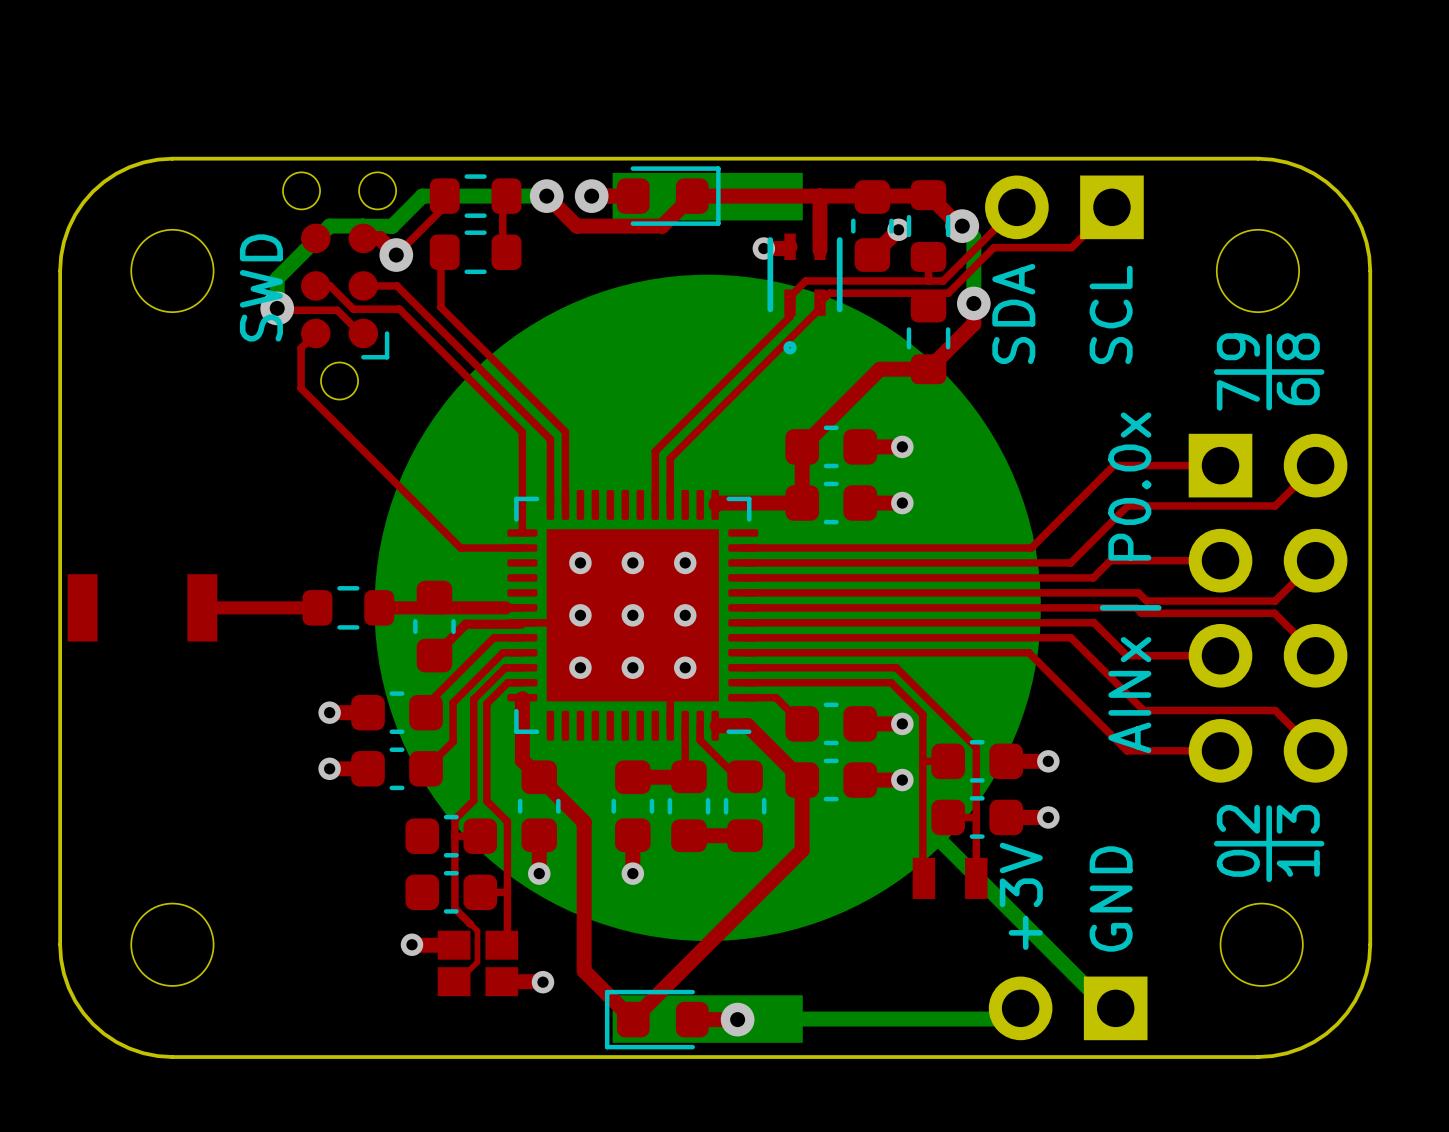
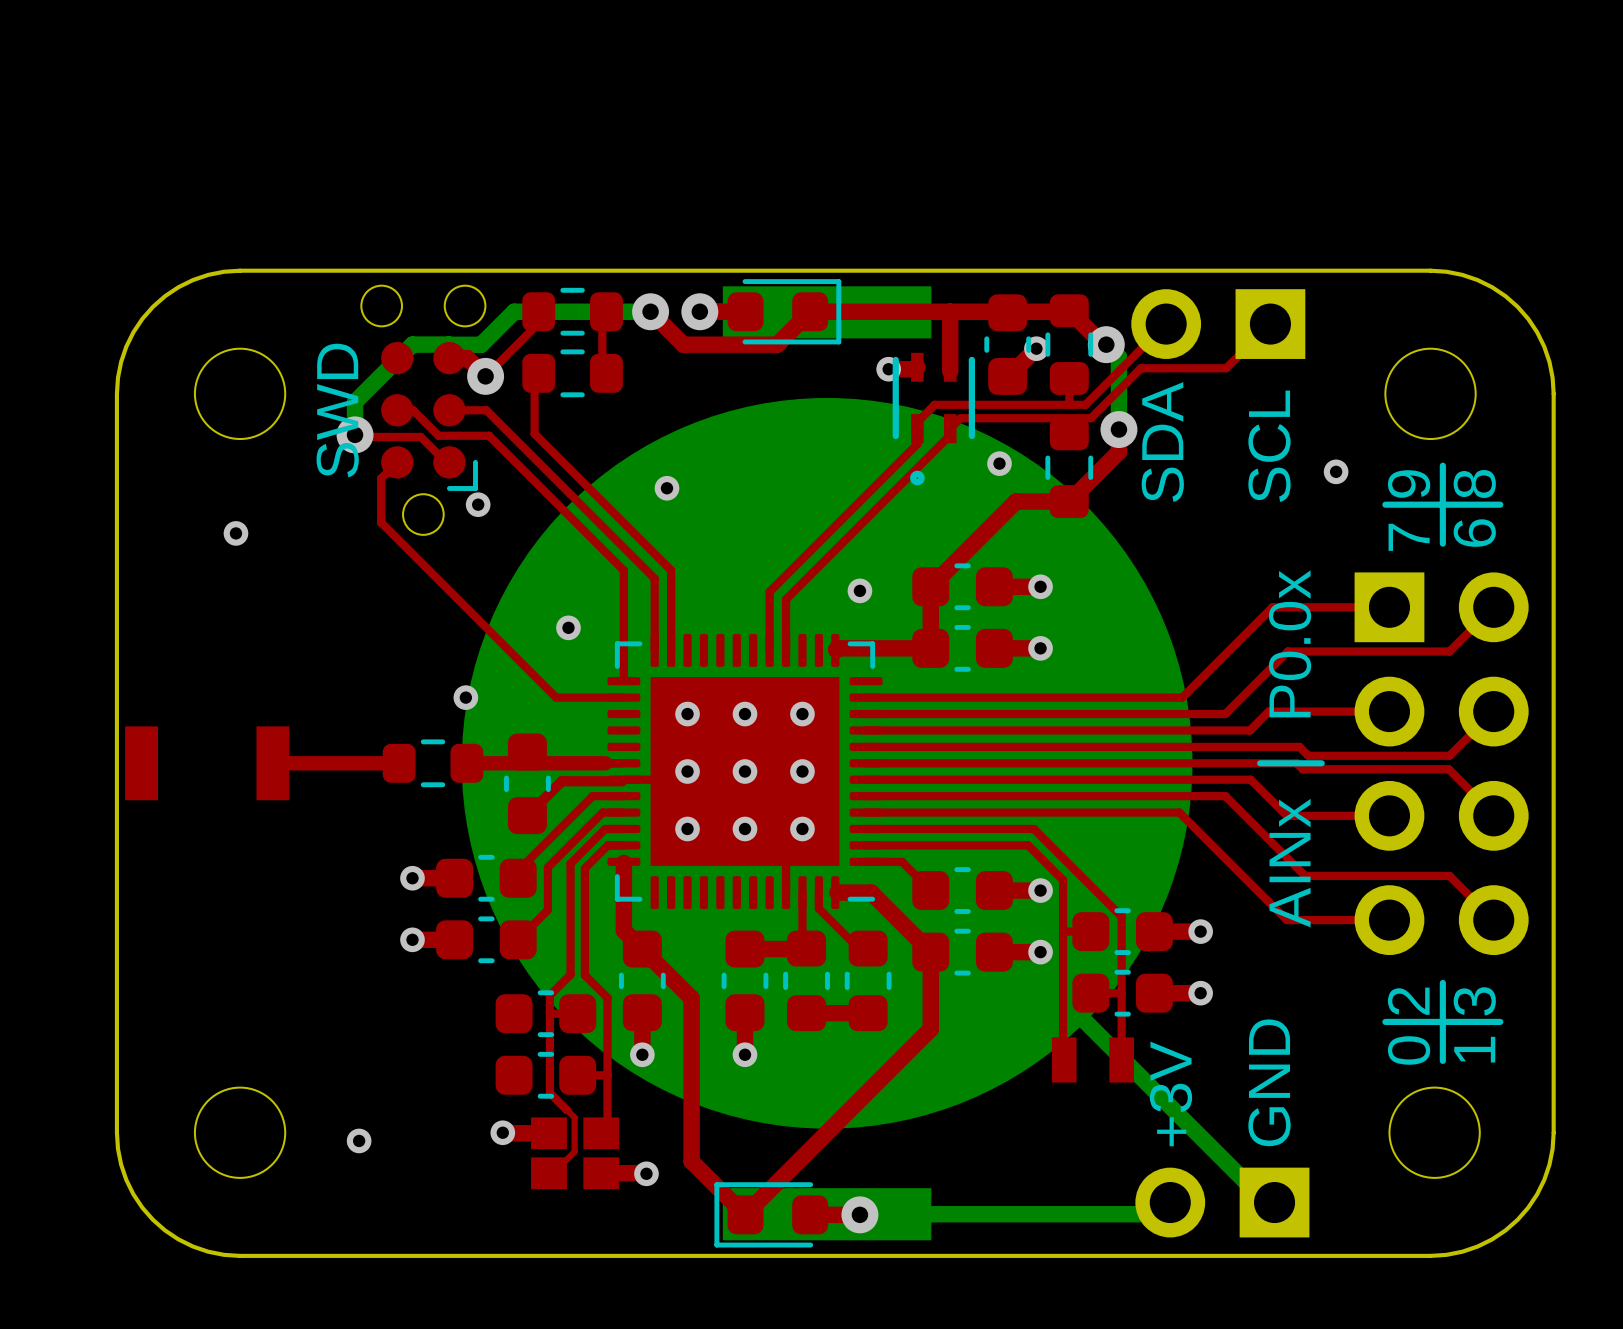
via: none -> (999, 463)
via: none -> (1336, 471)
via: none -> (667, 488)
via: none -> (478, 504)
via: none -> (235, 533)
via: none -> (859, 590)
via: none -> (568, 627)
via: none -> (465, 697)
via: none -> (359, 1140)

